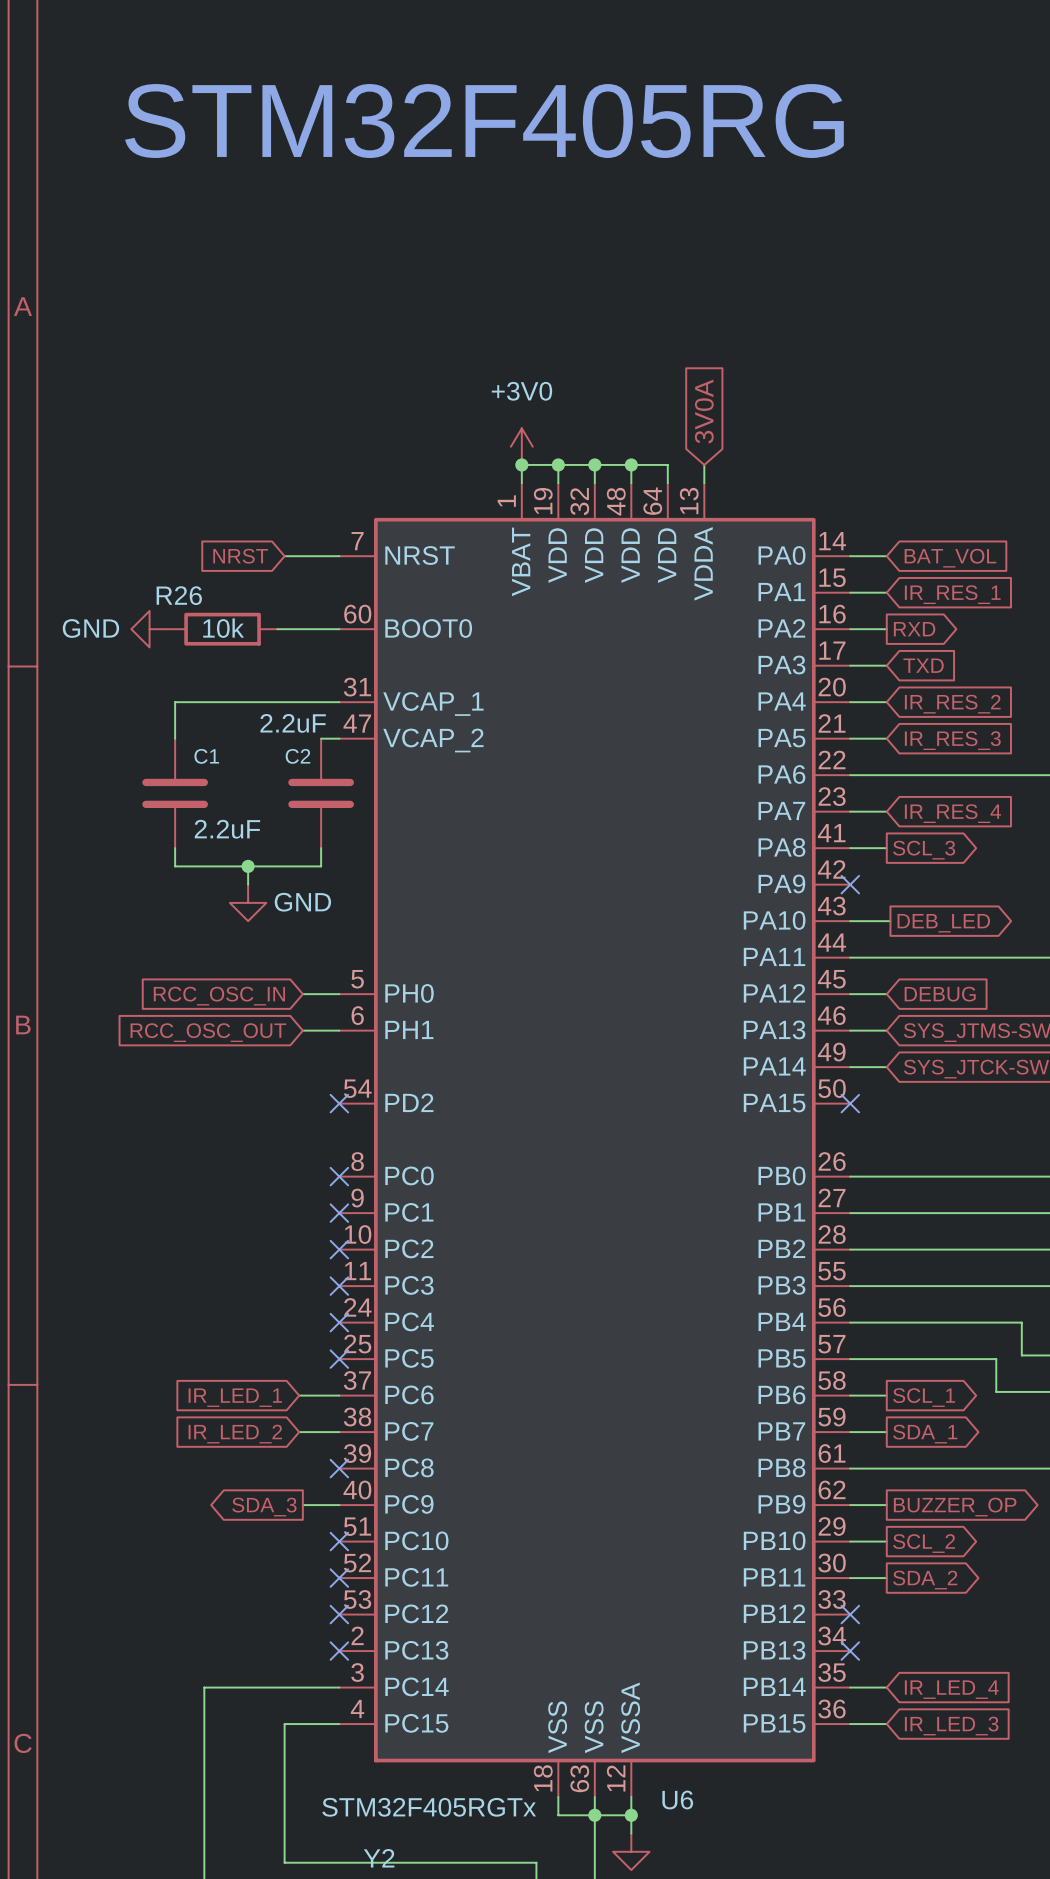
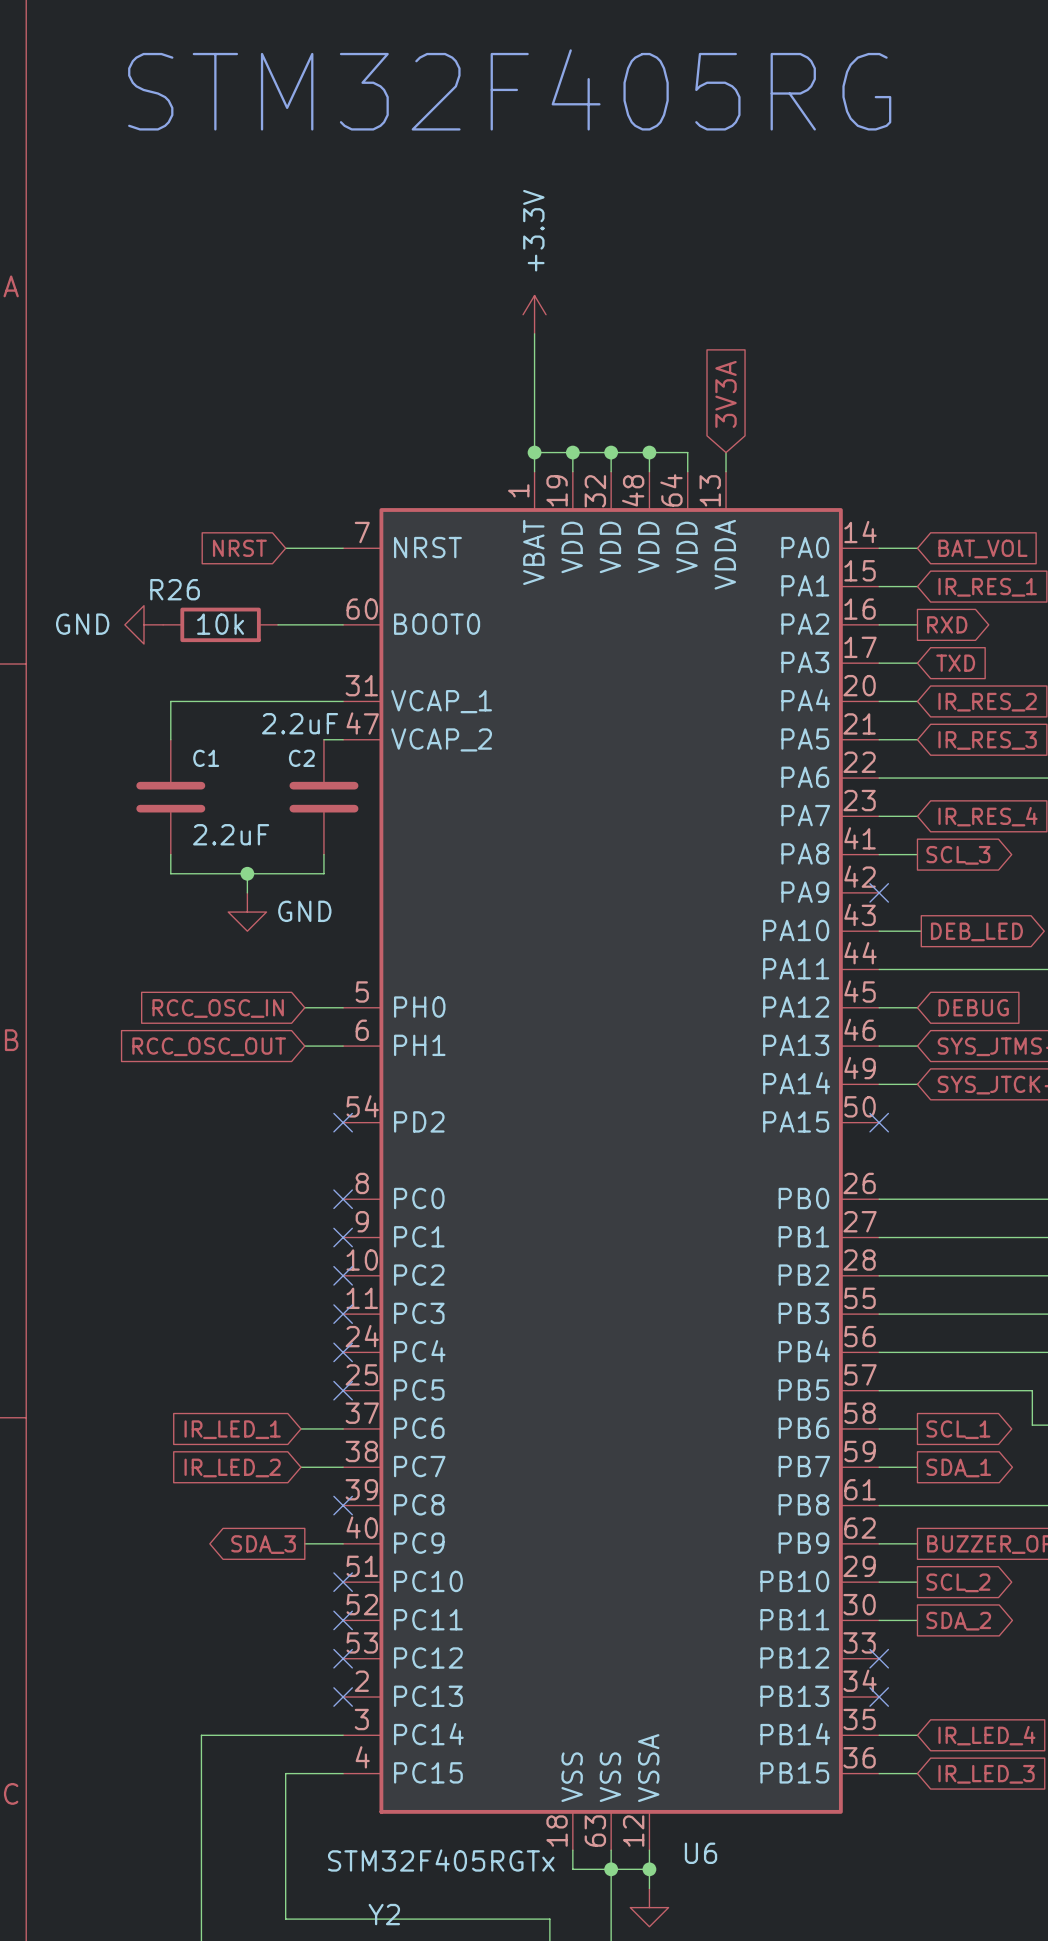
power symbol: none -> +3.3V (534, 314)
wire: none -> (534, 333) (534, 452)
global label: 3V0A (704, 411) -> 3V3A (726, 394)
power symbol: +3V0 (521, 446) -> none

